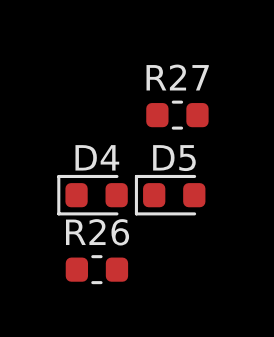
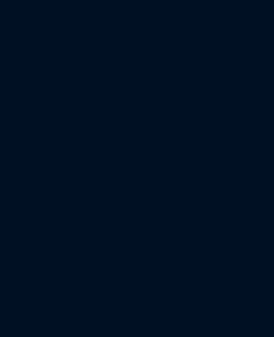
R27: (177, 115) -> none
D4: (92, 195) -> none
D5: (170, 195) -> none
R26: (96, 269) -> none

